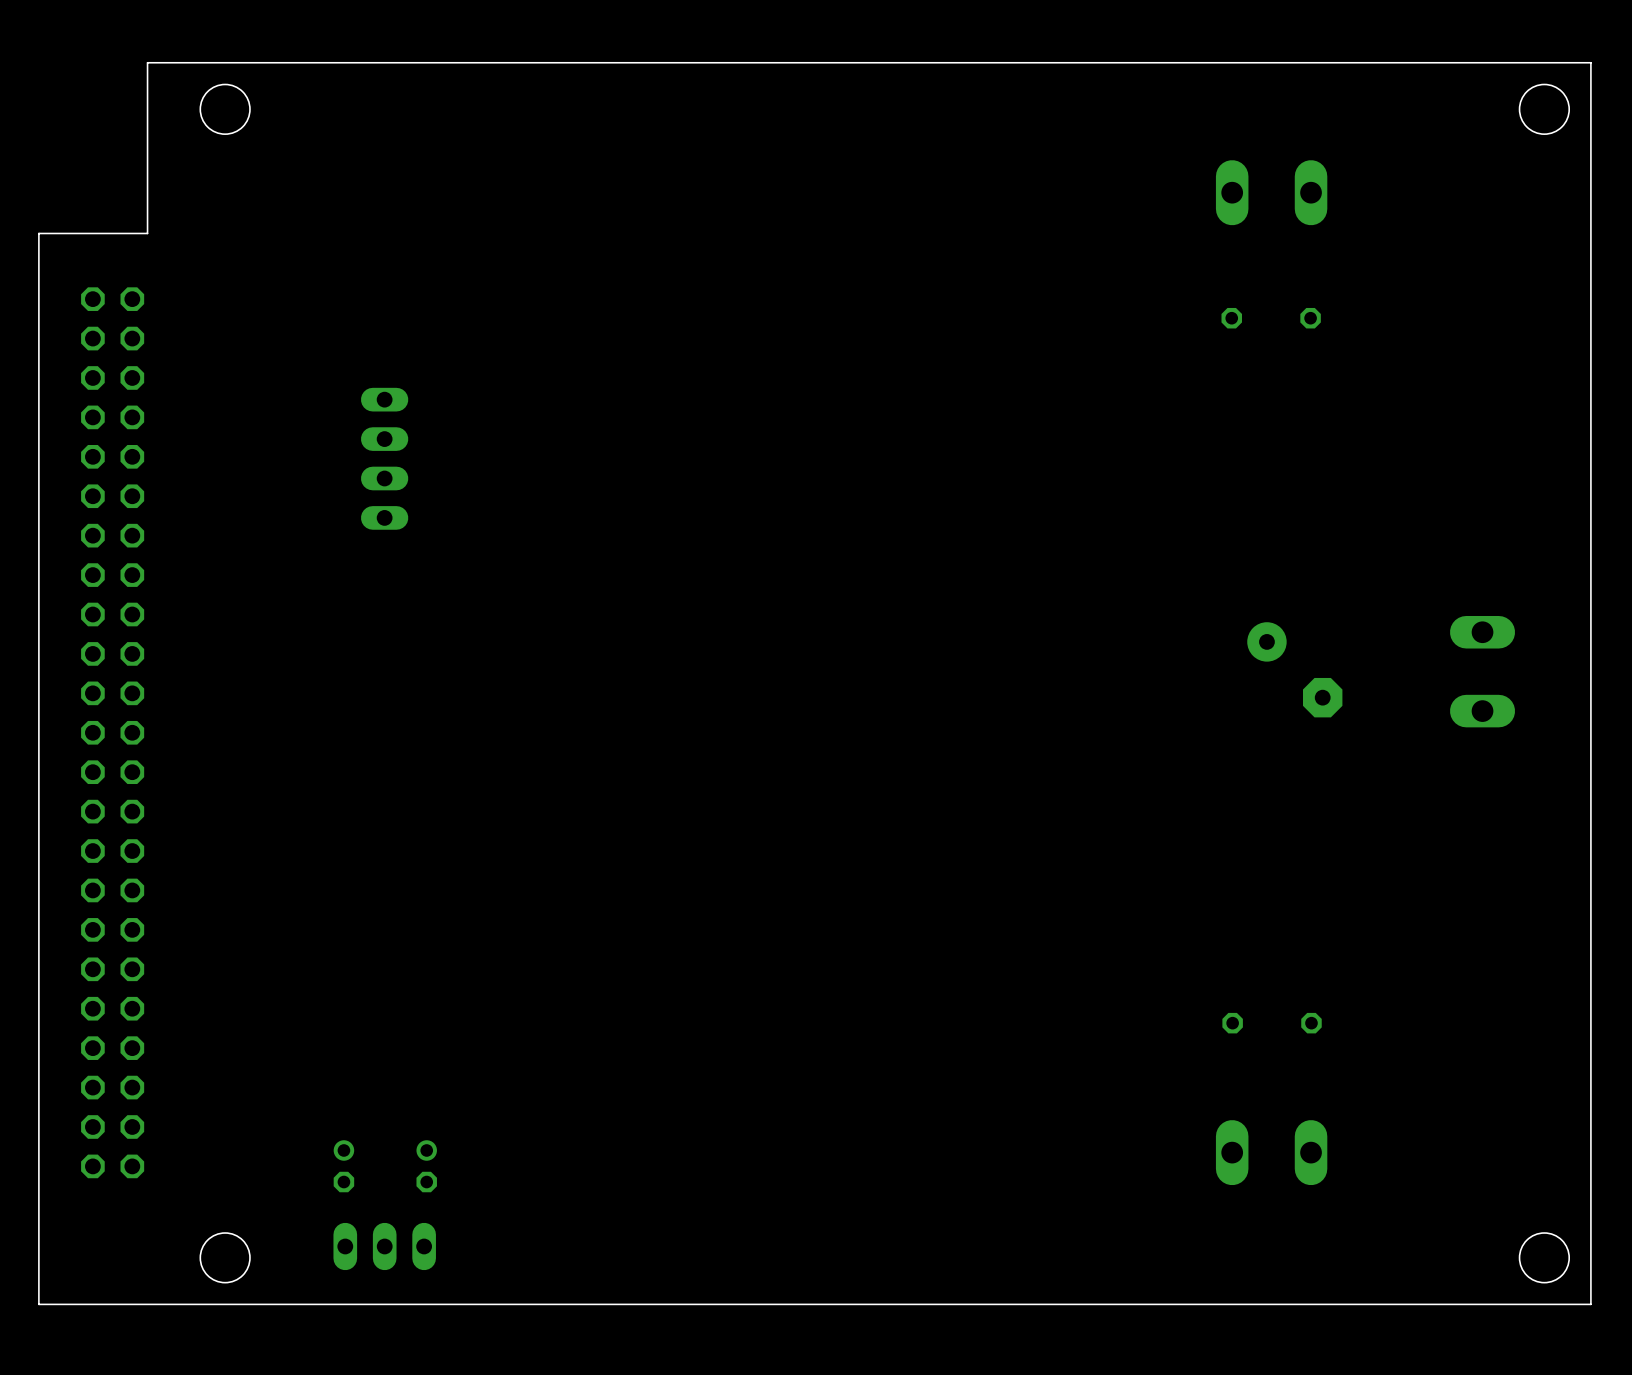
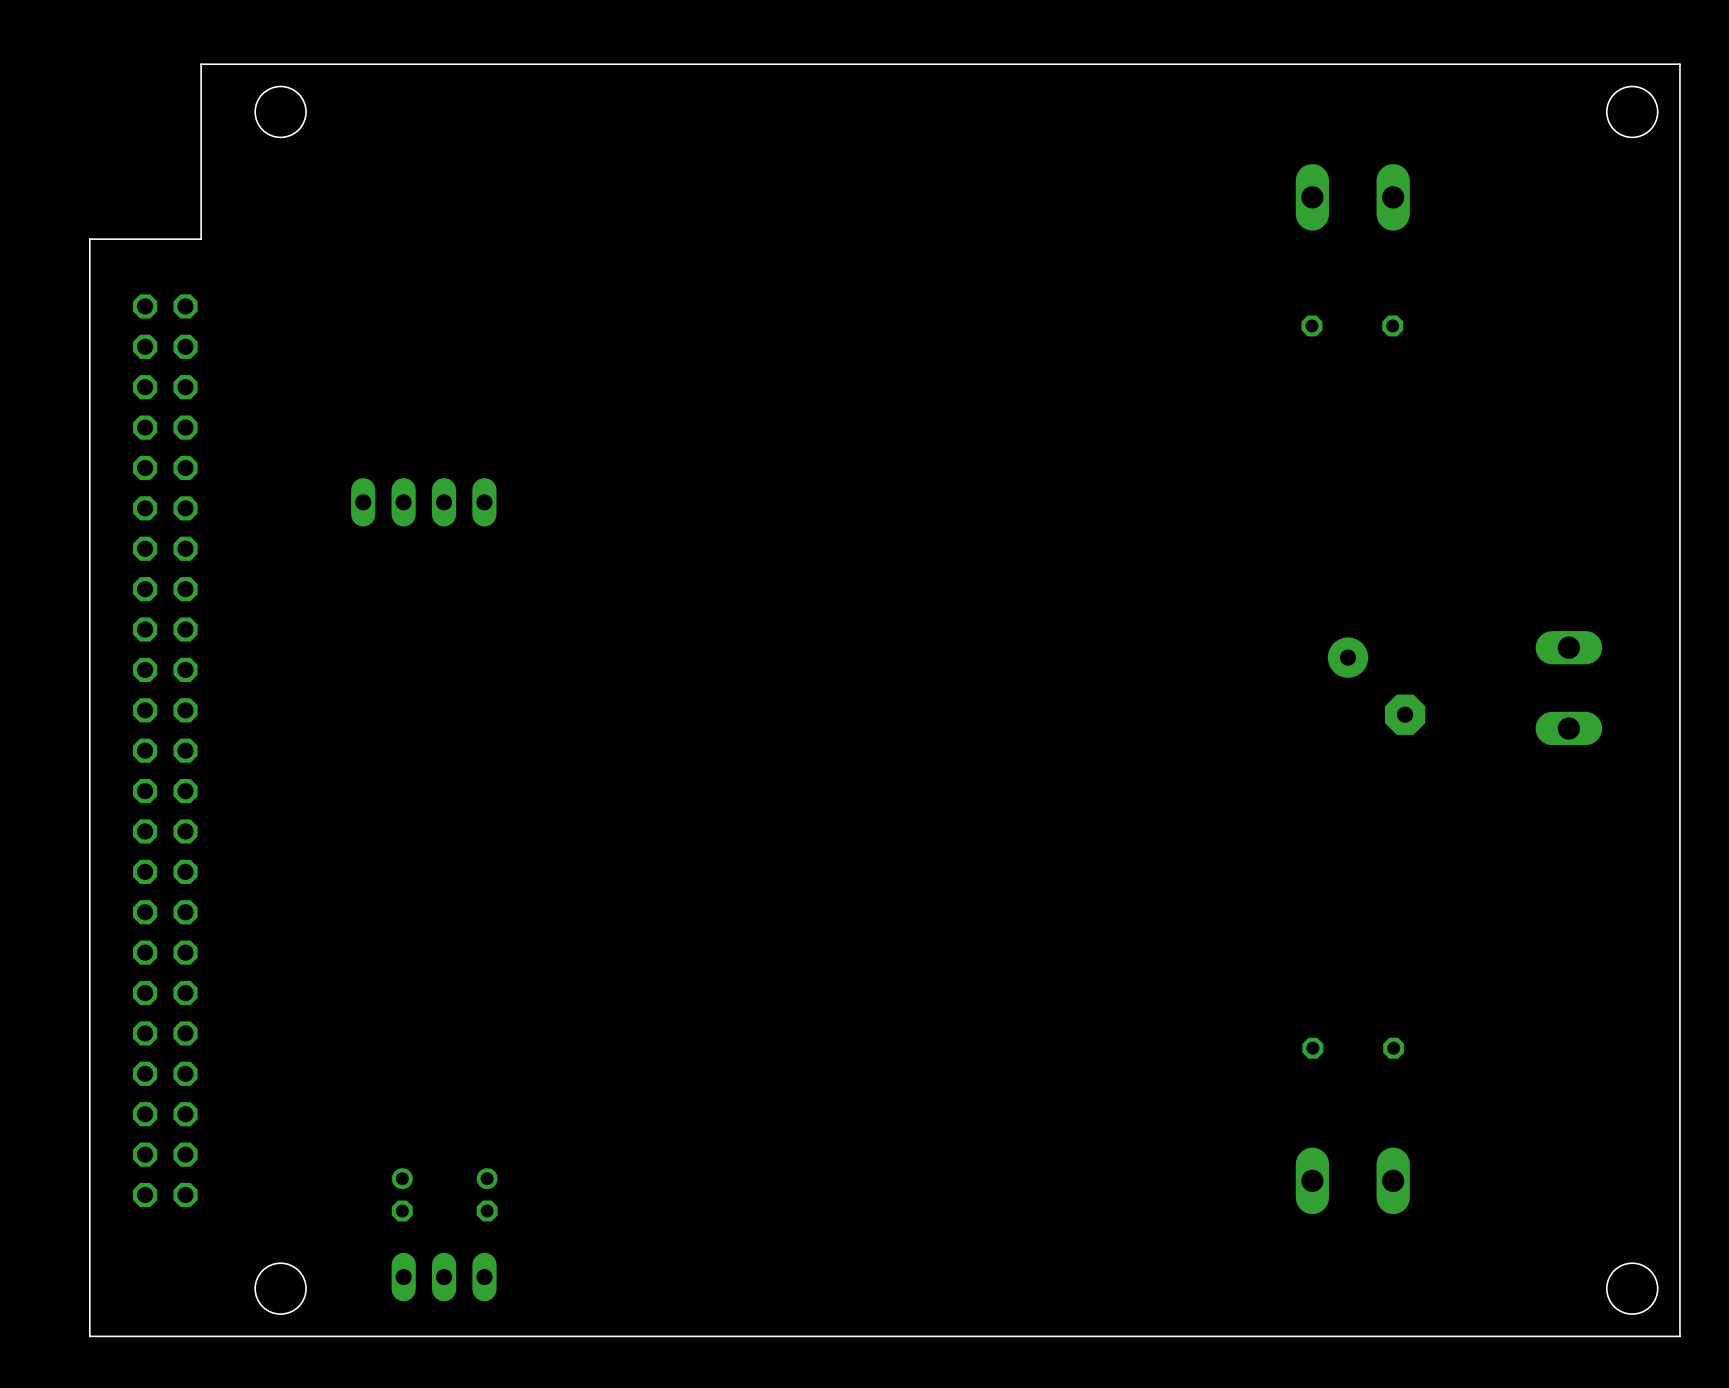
part rotation: 0° (384, 458) -> 90° clockwise (423, 502)

